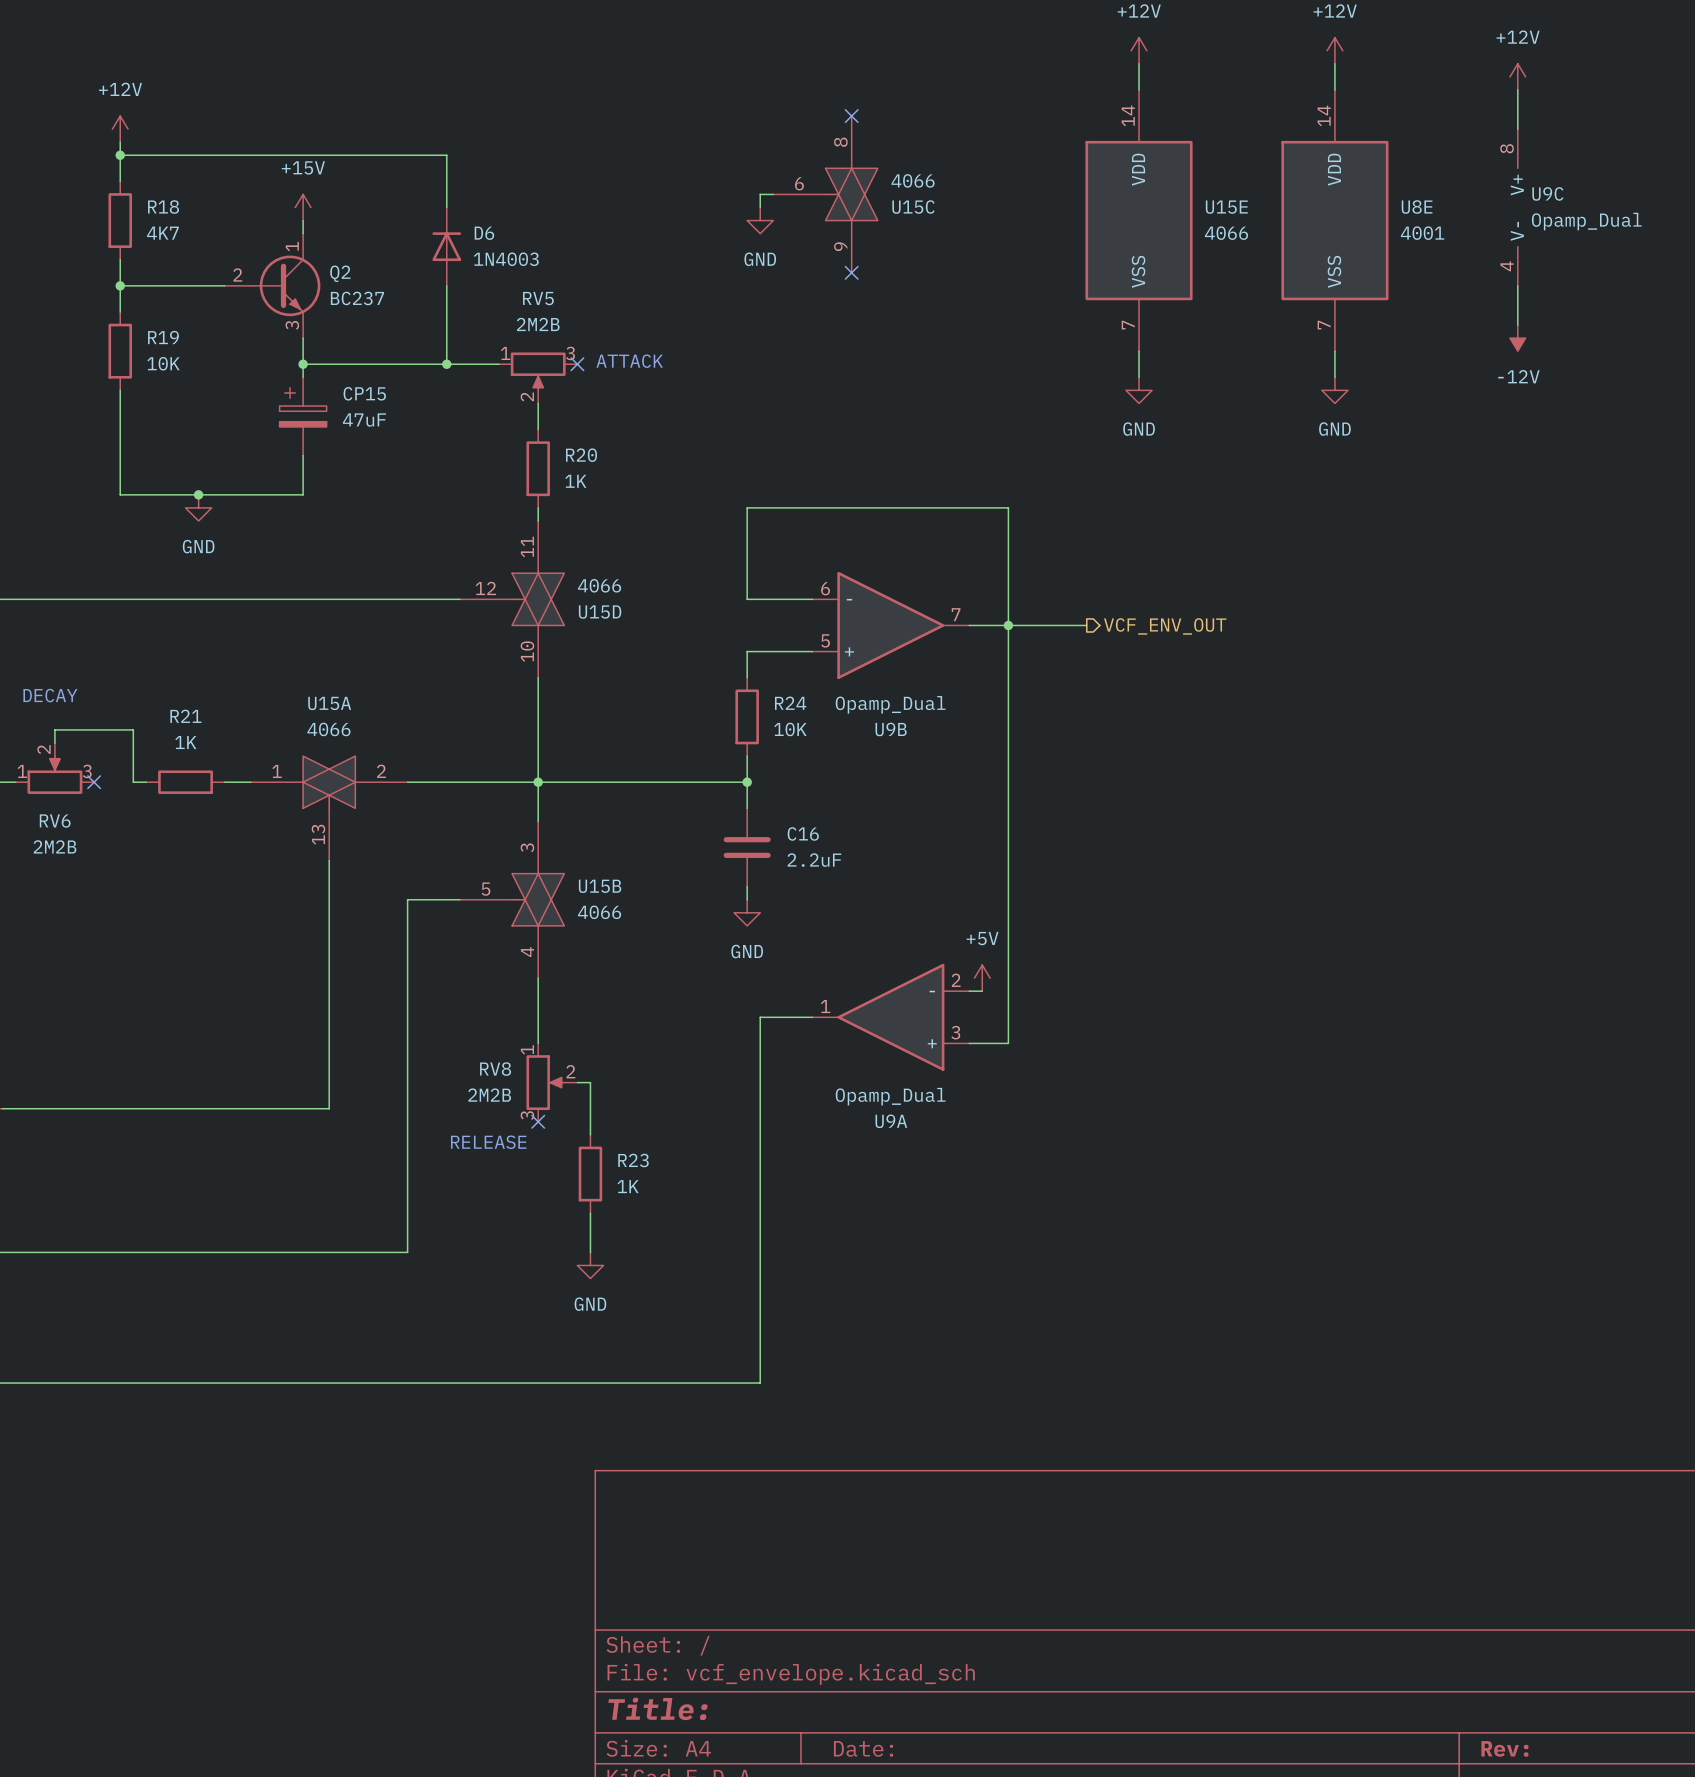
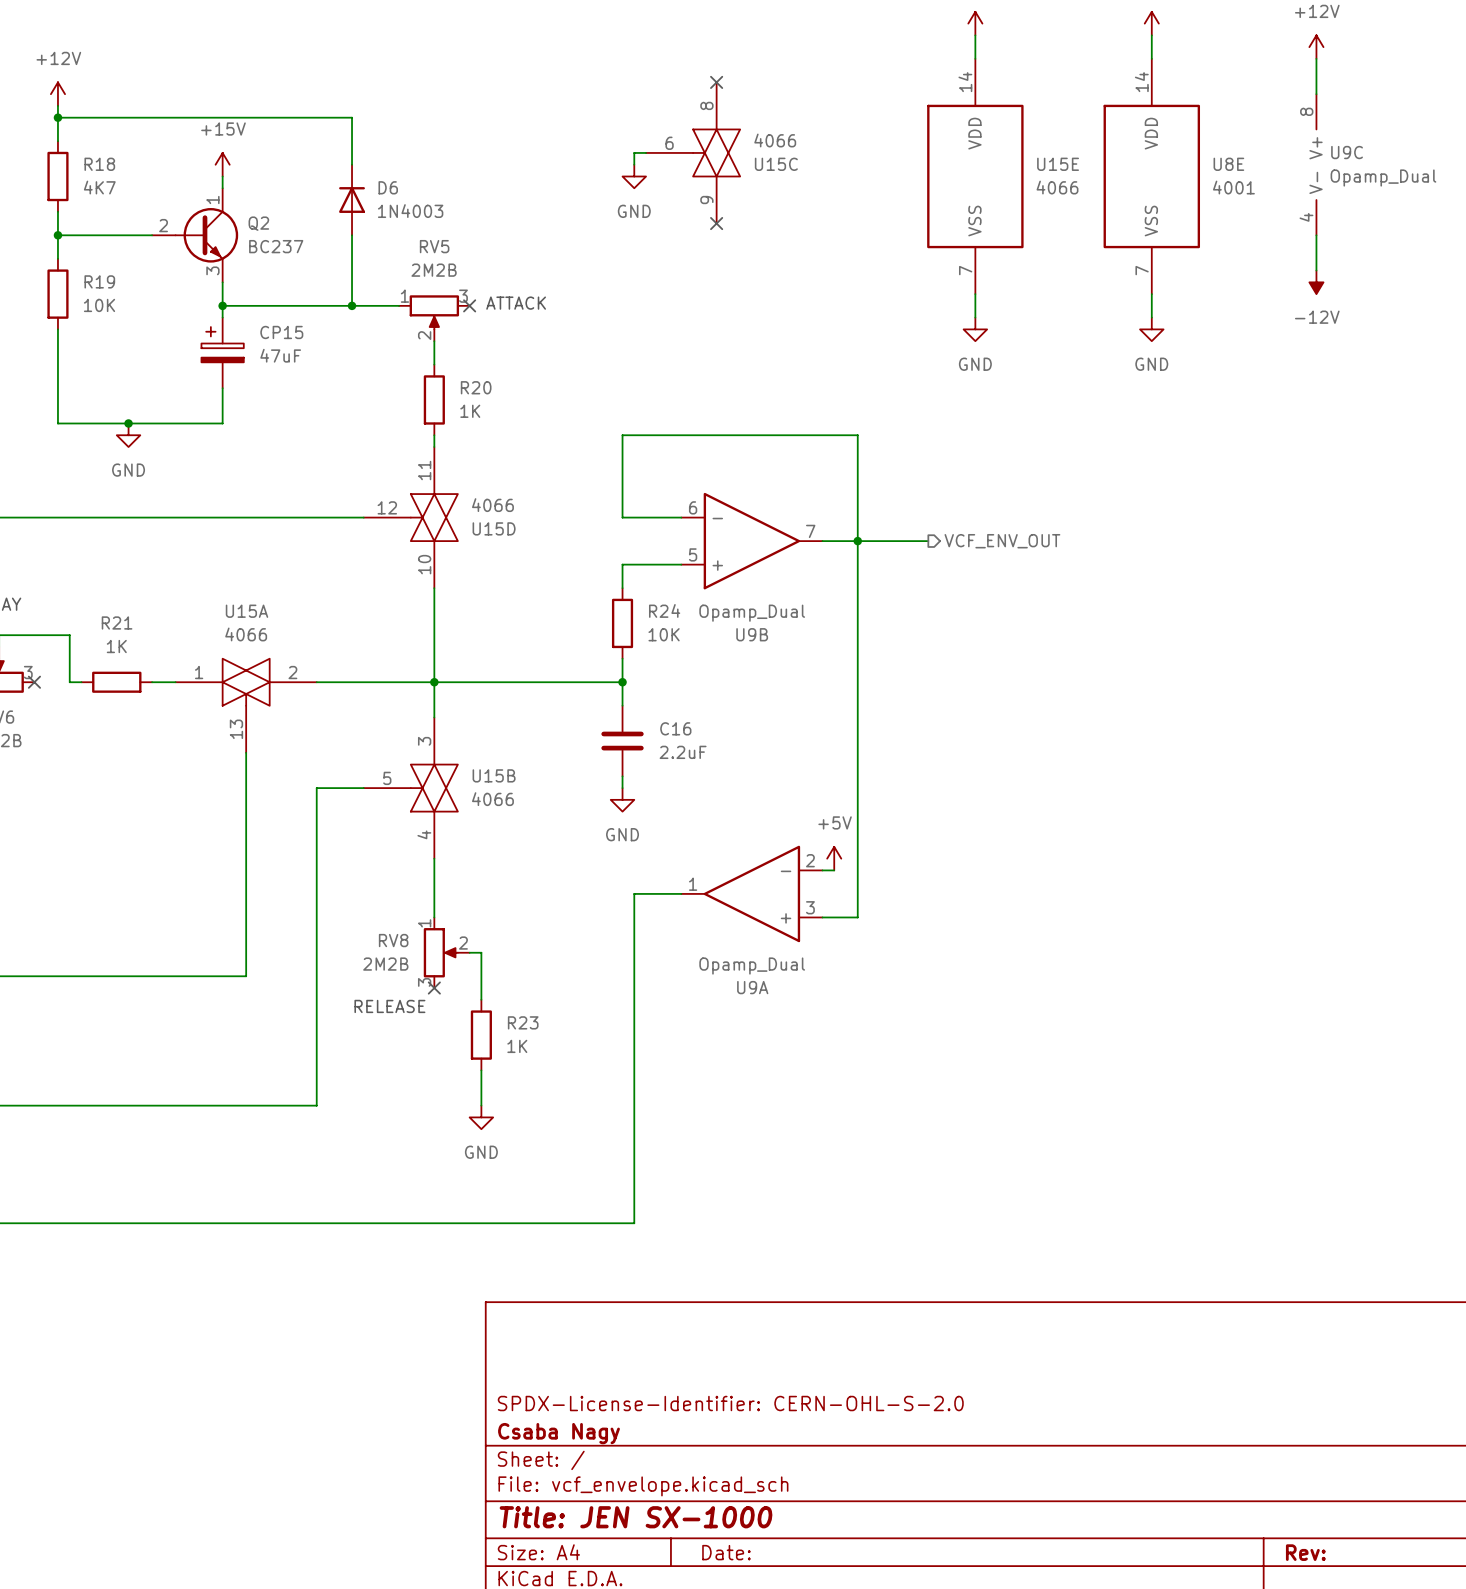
title block: none -> SPDX-License-Identifier: CERN-OHL-S-2.0 (730, 1403)
title block: none -> Csaba Nagy (559, 1433)
title block: Title: (658, 1708) -> Title: JEN SX-1000 (636, 1517)

